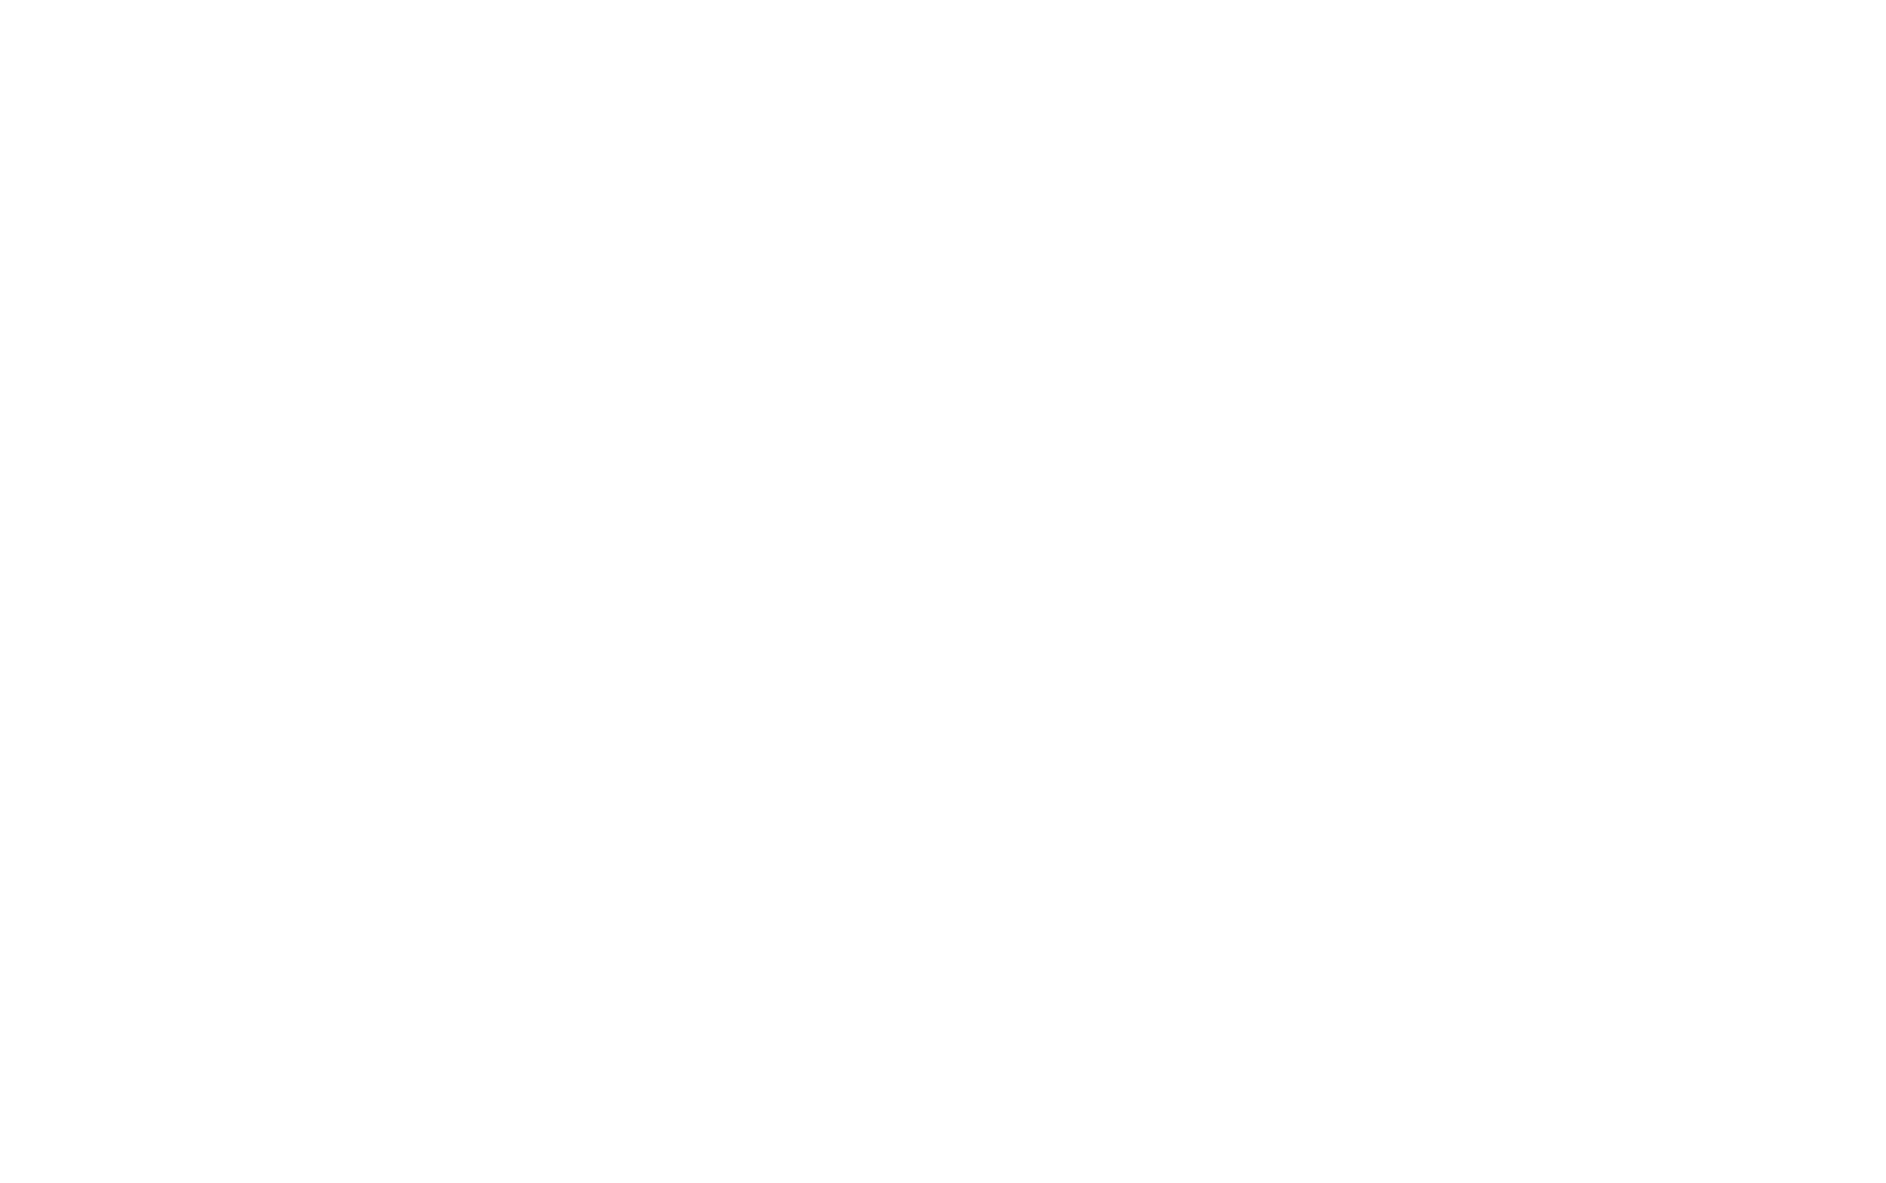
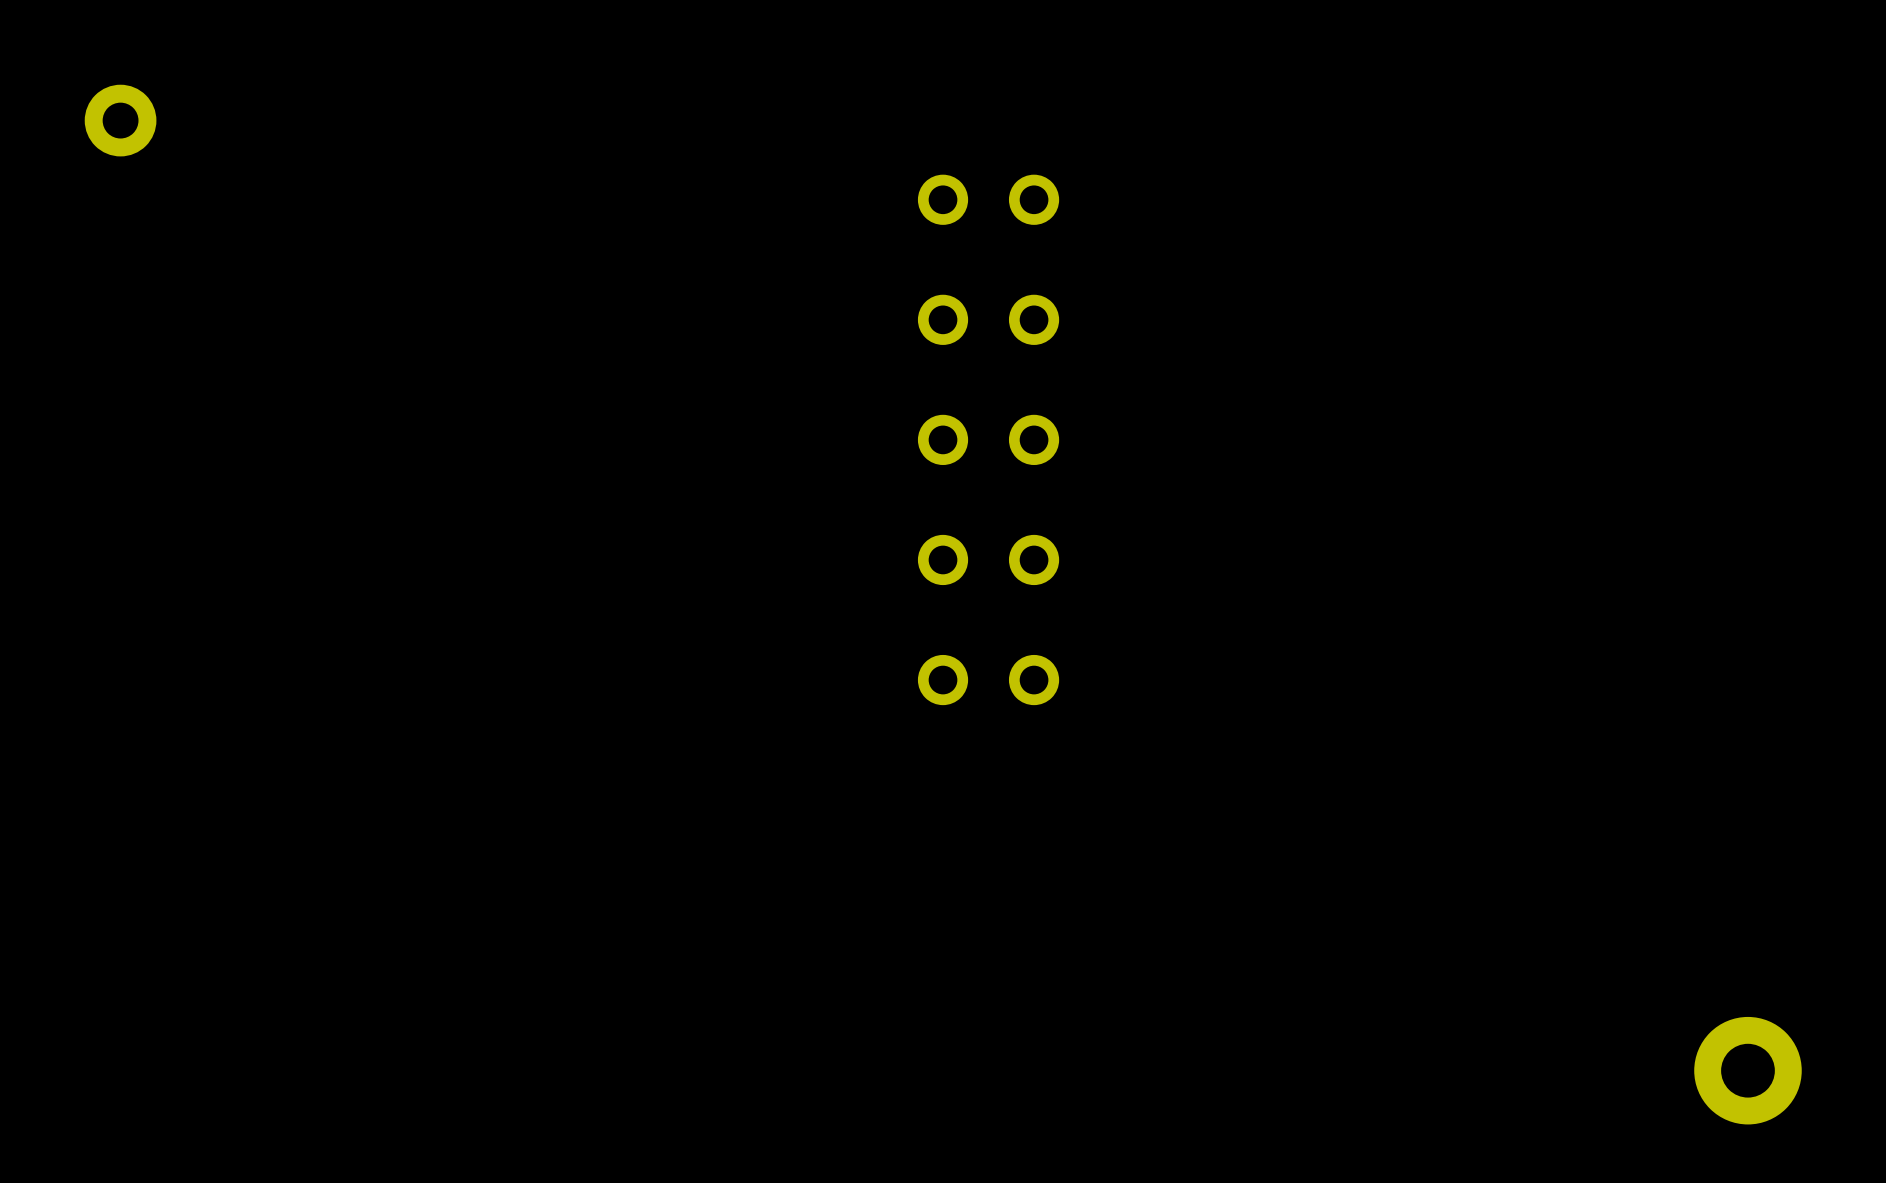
part: none -> (120, 120)
part: none -> (988, 199)
part: none -> (988, 319)
part: none -> (988, 439)
part: none -> (988, 559)
part: none -> (988, 680)
part: none -> (1747, 1070)

